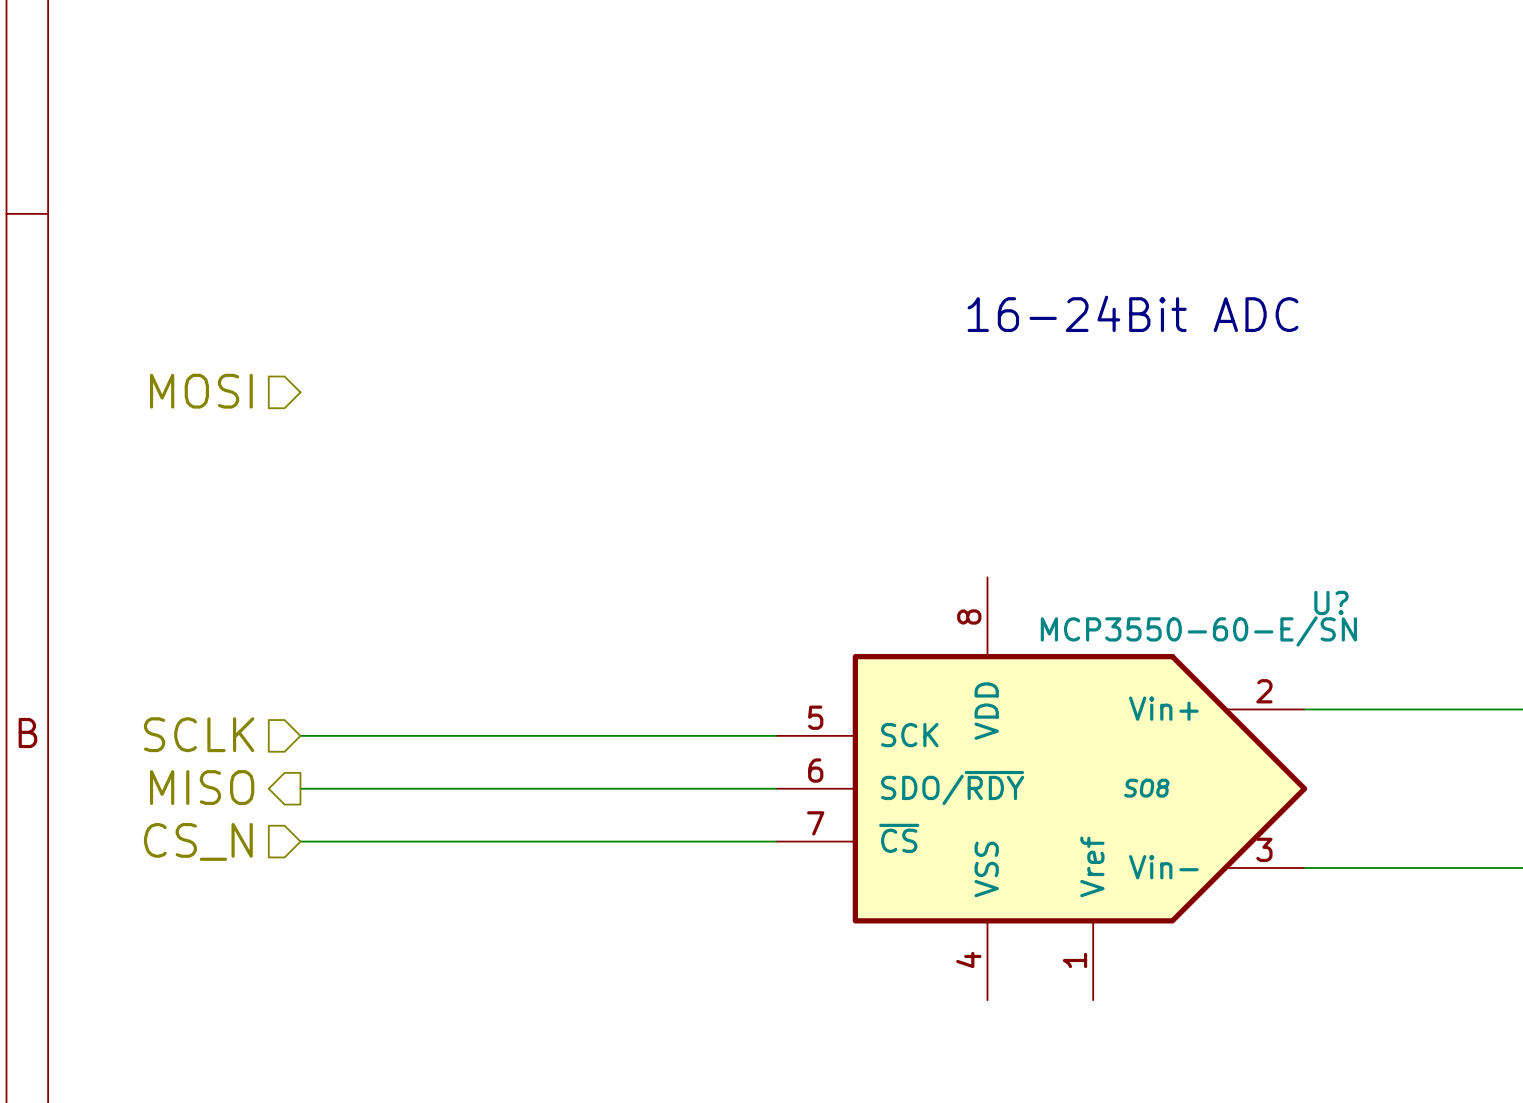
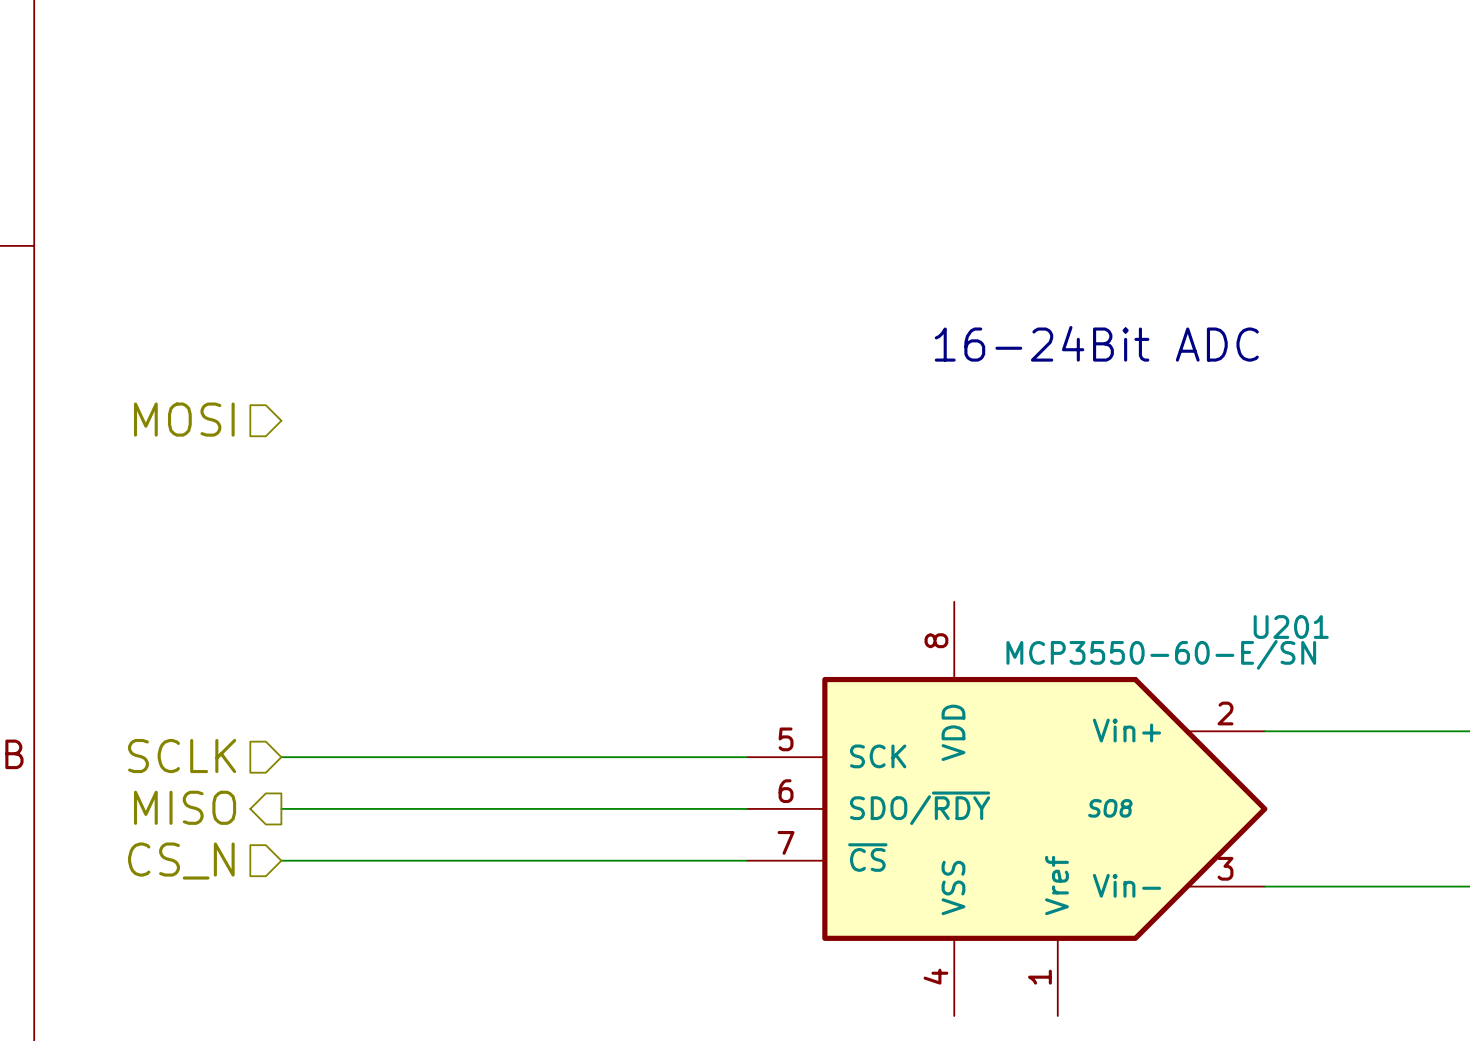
U? name: U? (1331, 602) -> U201 (1291, 627)

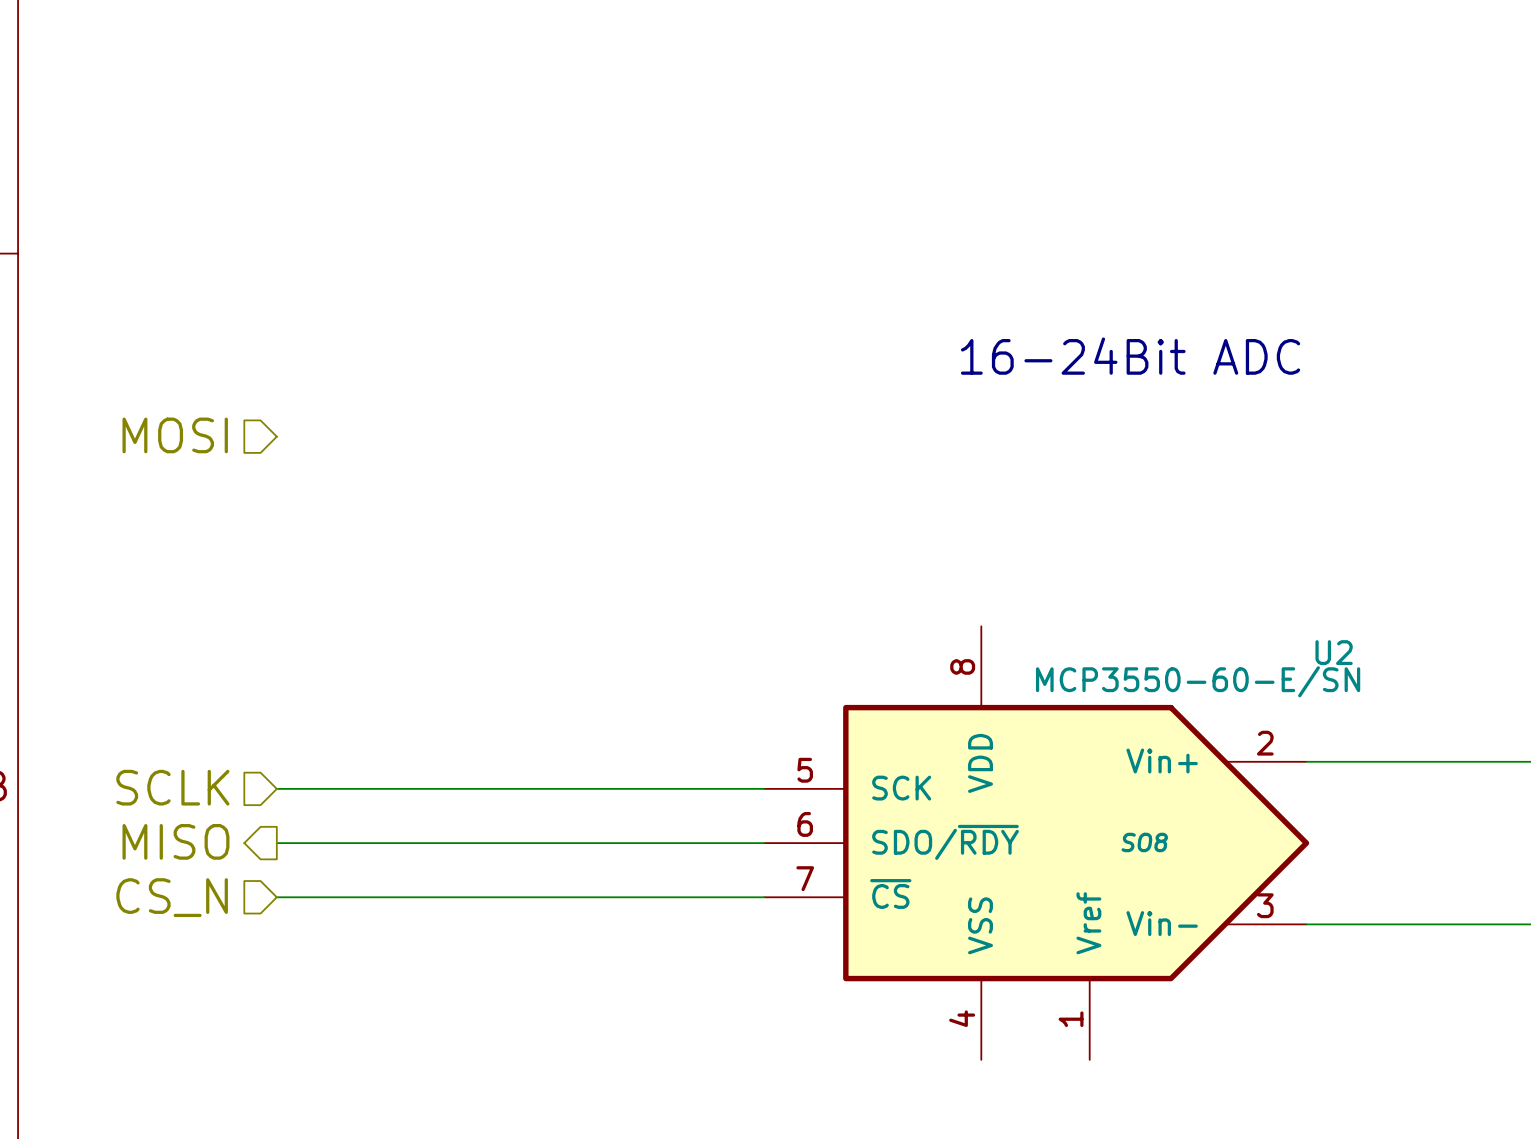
U201 name: U201 (1291, 627) -> U2 (1334, 652)

